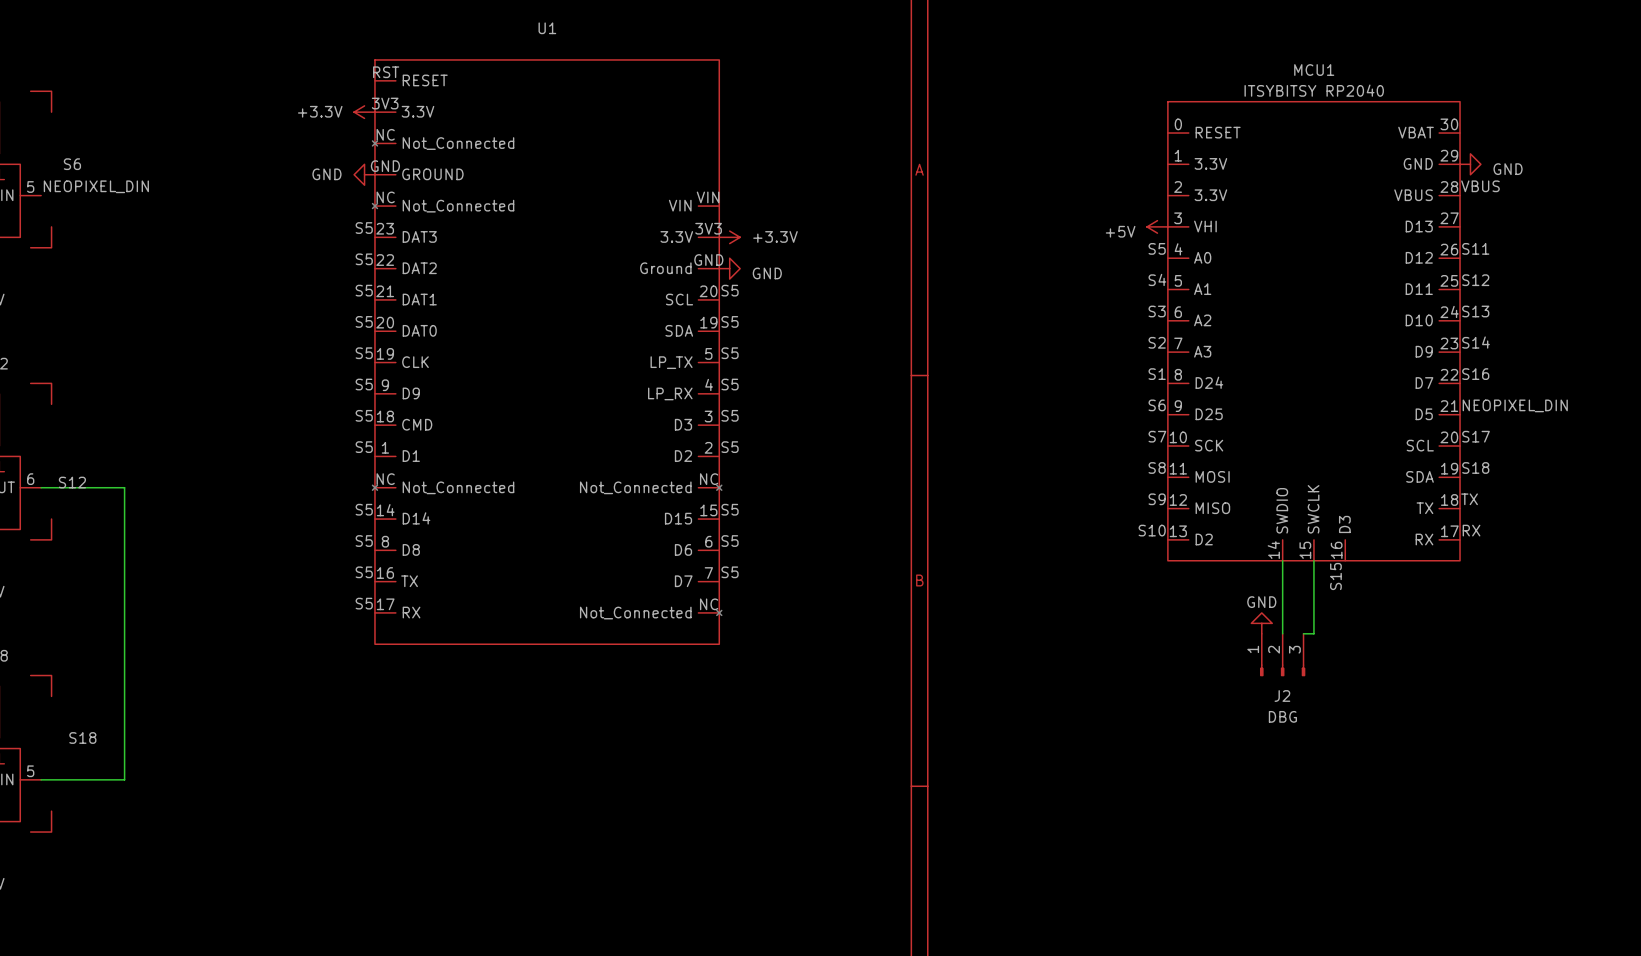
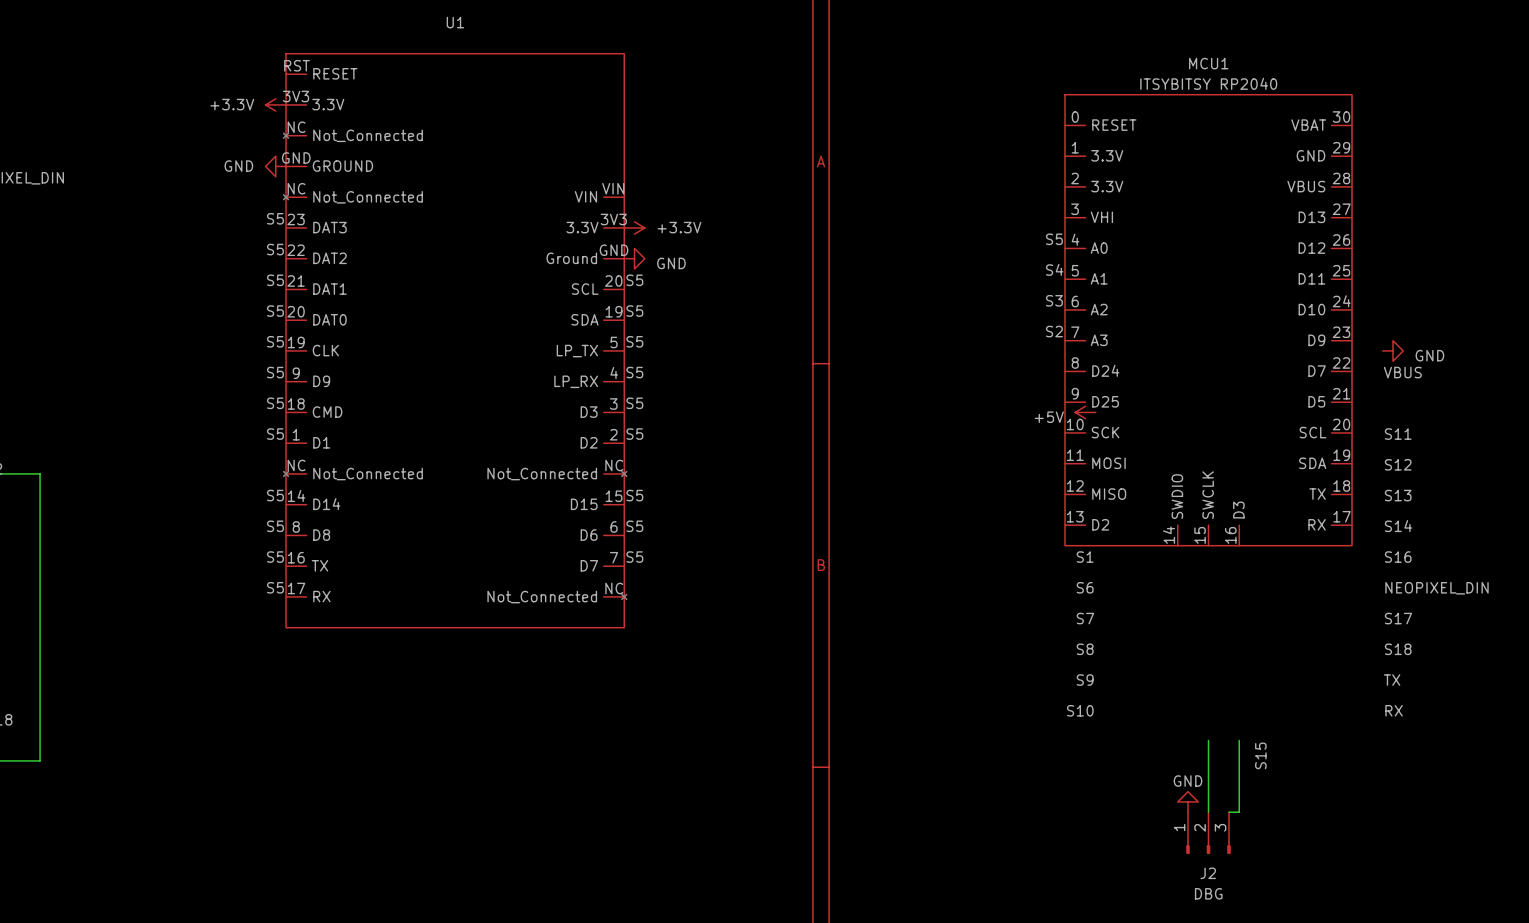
power symbol: GND (1470, 164) -> none
label position: VBUS (1480, 186) -> VBUS (1402, 372)
power symbol position: +5V (1157, 226) -> +5V (1085, 412)
label position: S11 (1475, 248) -> S11 (1398, 434)
label position: S12 (1475, 280) -> S12 (1398, 464)
label position: S13 (1475, 311) -> S13 (1398, 495)
label position: S14 (1476, 342) -> S14 (1398, 526)
power symbol: none -> GND (1393, 350)
label position: S1 (1157, 374) -> S1 (1085, 557)
label position: S16 (1475, 374) -> S16 (1398, 557)
label position: S6 (1157, 405) -> S6 (1085, 587)
label position: NEOPIXEL_DIN (1515, 405) -> NEOPIXEL_DIN (1437, 588)
label position: S7 (1157, 436) -> S7 (1085, 618)
label position: S17 (1476, 436) -> S17 (1398, 618)
label position: S8 (1157, 467) -> S8 (1085, 649)
label position: S18 (1475, 467) -> S18 (1398, 649)
label position: S9 (1157, 499) -> S9 (1085, 680)
label position: TX (1469, 499) -> TX (1392, 680)
label position: S10 (1152, 530) -> S10 (1080, 710)
label position: RX (1471, 530) -> RX (1394, 710)
wire: (1282, 560) (1282, 633) -> (1208, 740) (1208, 812)
wire: (1313, 560) (1313, 633) (1303, 633) -> (1239, 740) (1239, 812) (1229, 812)
label position: S15 (1335, 576) -> S15 (1260, 755)
power symbol: GND (1261, 623) -> none
J2 position: (1282, 654) -> (1208, 832)
power symbol: none -> GND (1188, 801)

